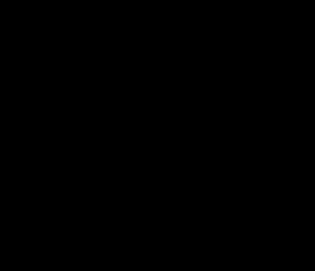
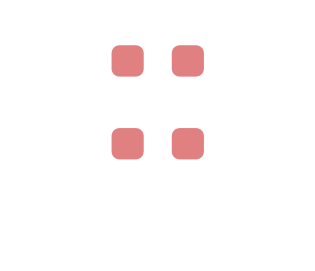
part: none -> (157, 60)
part: none -> (157, 143)

